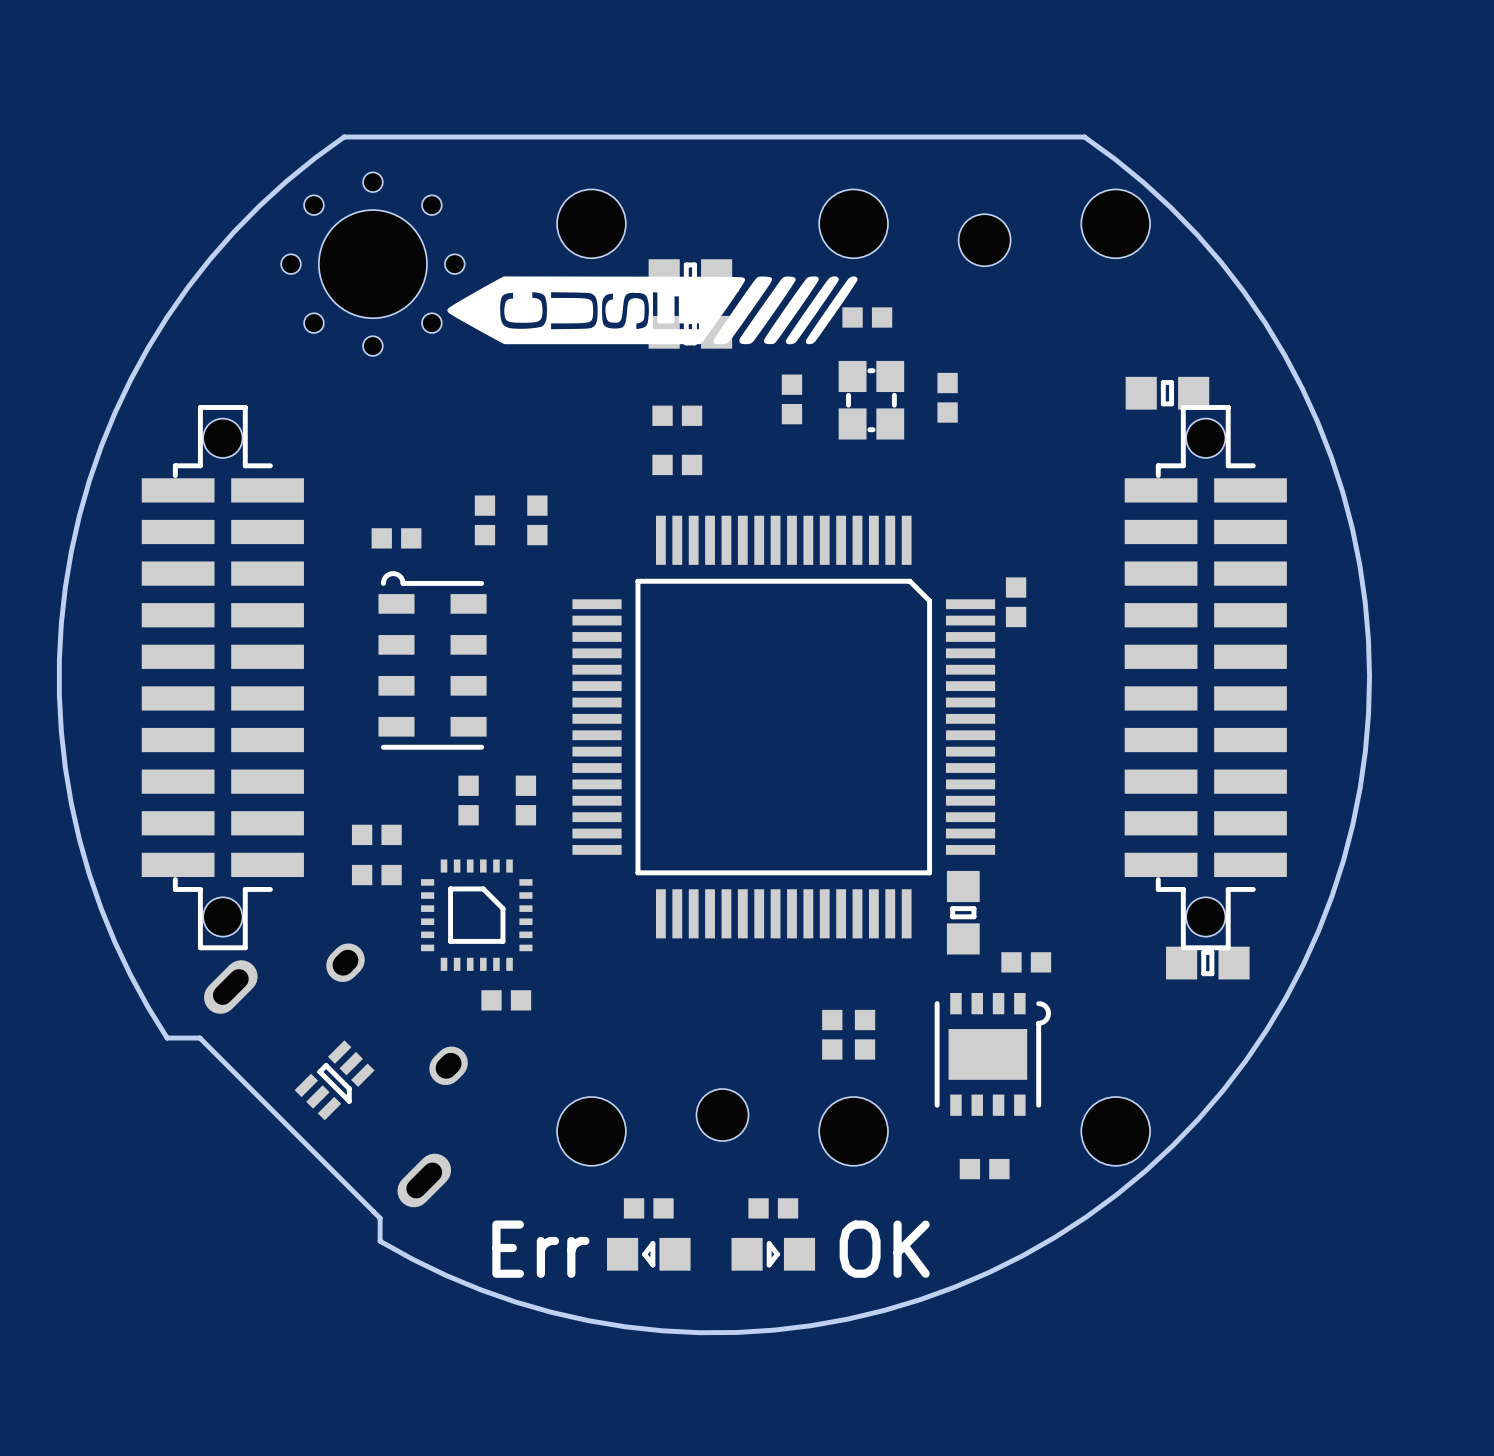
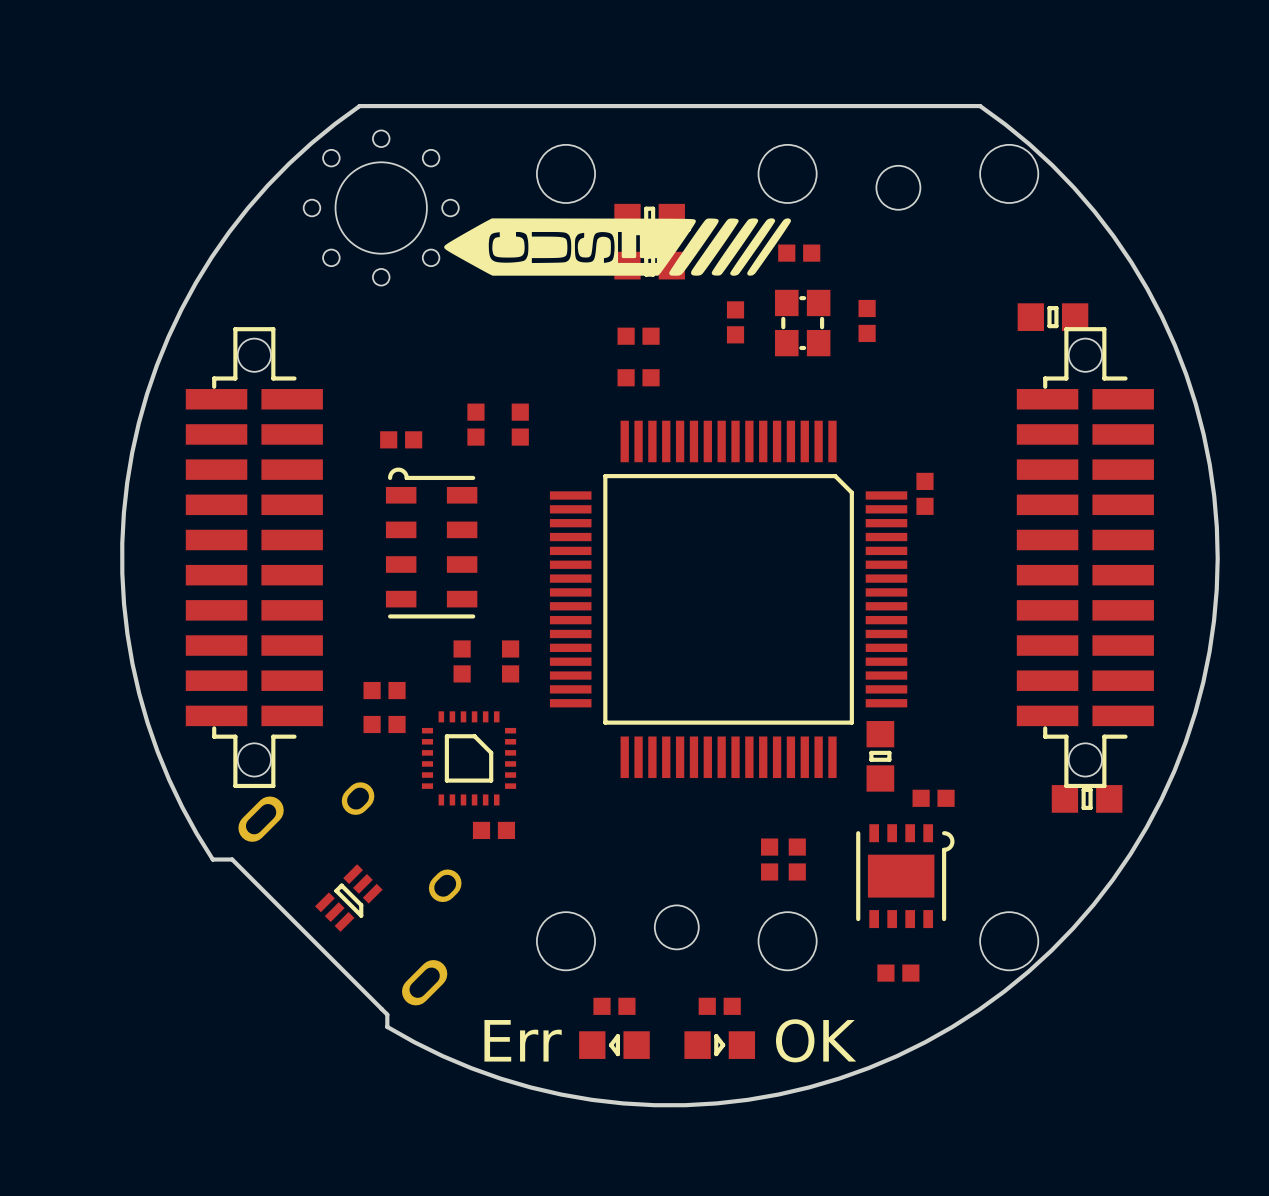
board edge: (344, 136) (286, 181) (234, 231) (210, 258) (167, 317) (130, 380) (101, 446) (79, 515) (65, 587) (59, 659) (61, 732) (71, 804) (89, 874) (115, 942) (130, 975) (167, 1038) (199, 1038) -> none
board edge: (344, 137) (1084, 137) (1143, 182) (1197, 234) (1244, 292) (1284, 355) (1317, 422) (1342, 492) (1359, 565) (1368, 639) (1369, 676) (1365, 750) (1352, 824) (1332, 896) (1318, 930) (1285, 998) (1266, 1030) (1223, 1090) (1172, 1145) (1116, 1194) (1055, 1237) (1022, 1255) (955, 1287) (884, 1310) (811, 1325) (774, 1330) (699, 1332) (662, 1330) (588, 1320) (516, 1302) (480, 1289) (412, 1259) (380, 1241) (380, 1232) -> (234, 862) (232, 859) (212, 859) (196, 833) (169, 779) (147, 722) (139, 693) (127, 634) (124, 603) (122, 543) (127, 482) (138, 423) (156, 365) (168, 337) (195, 282) (211, 257) (247, 208) (289, 163) (335, 123) (359, 106) (980, 106) (1029, 144) (1074, 187) (1113, 236) (1131, 262) (1161, 316) (1174, 345) (1195, 404) (1203, 434) (1214, 495) (1217, 558) (1216, 589) (1209, 651) (1203, 682) (1185, 742) (1161, 799) (1146, 827) (1112, 879) (1093, 904) (1073, 928) (1028, 971) (978, 1009) (925, 1042) (868, 1068) (839, 1078) (809, 1087) (747, 1099) (716, 1103) (654, 1105) (592, 1099) (561, 1094) (530, 1087) (471, 1068) (414, 1042) (387, 1026)

